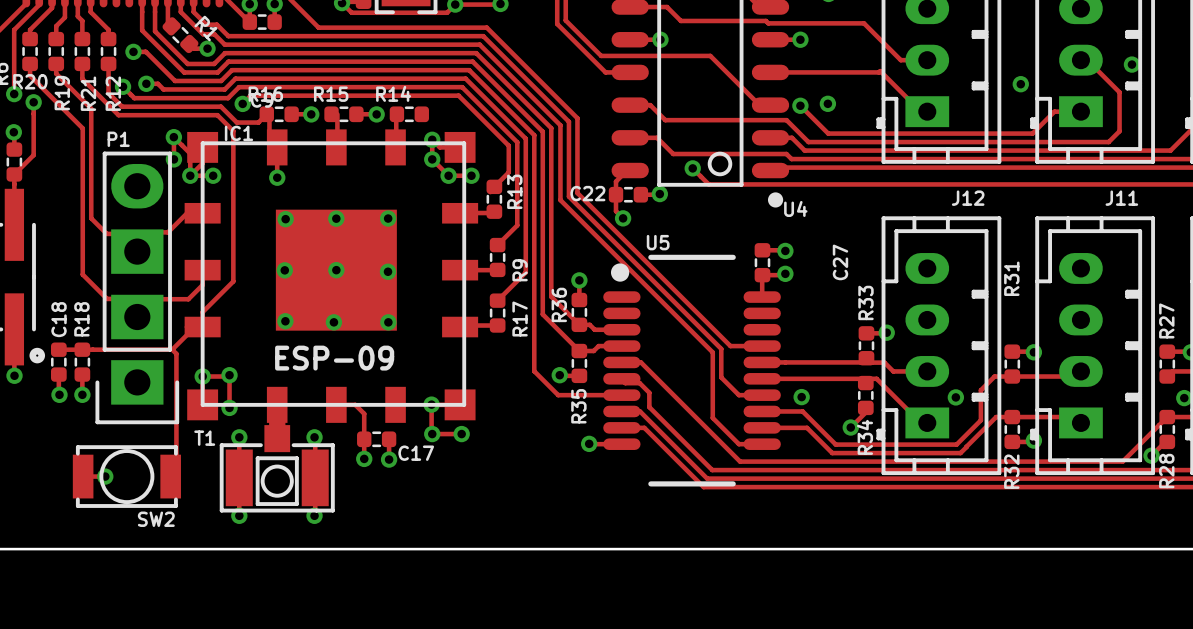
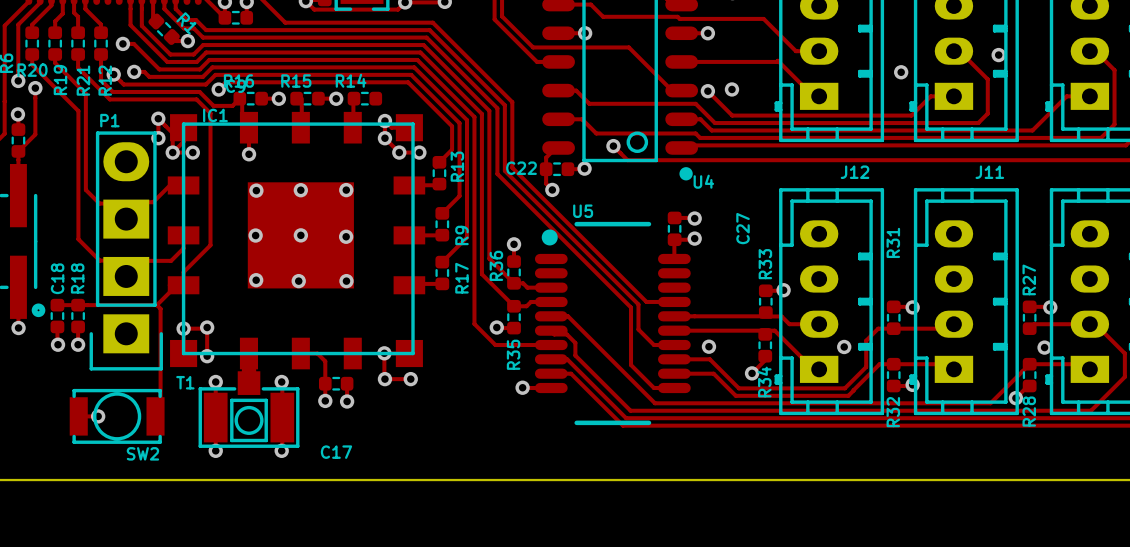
text: ESP-09 (334, 358) -> none
C17 name position: C17 (416, 453) -> C17 (336, 452)

